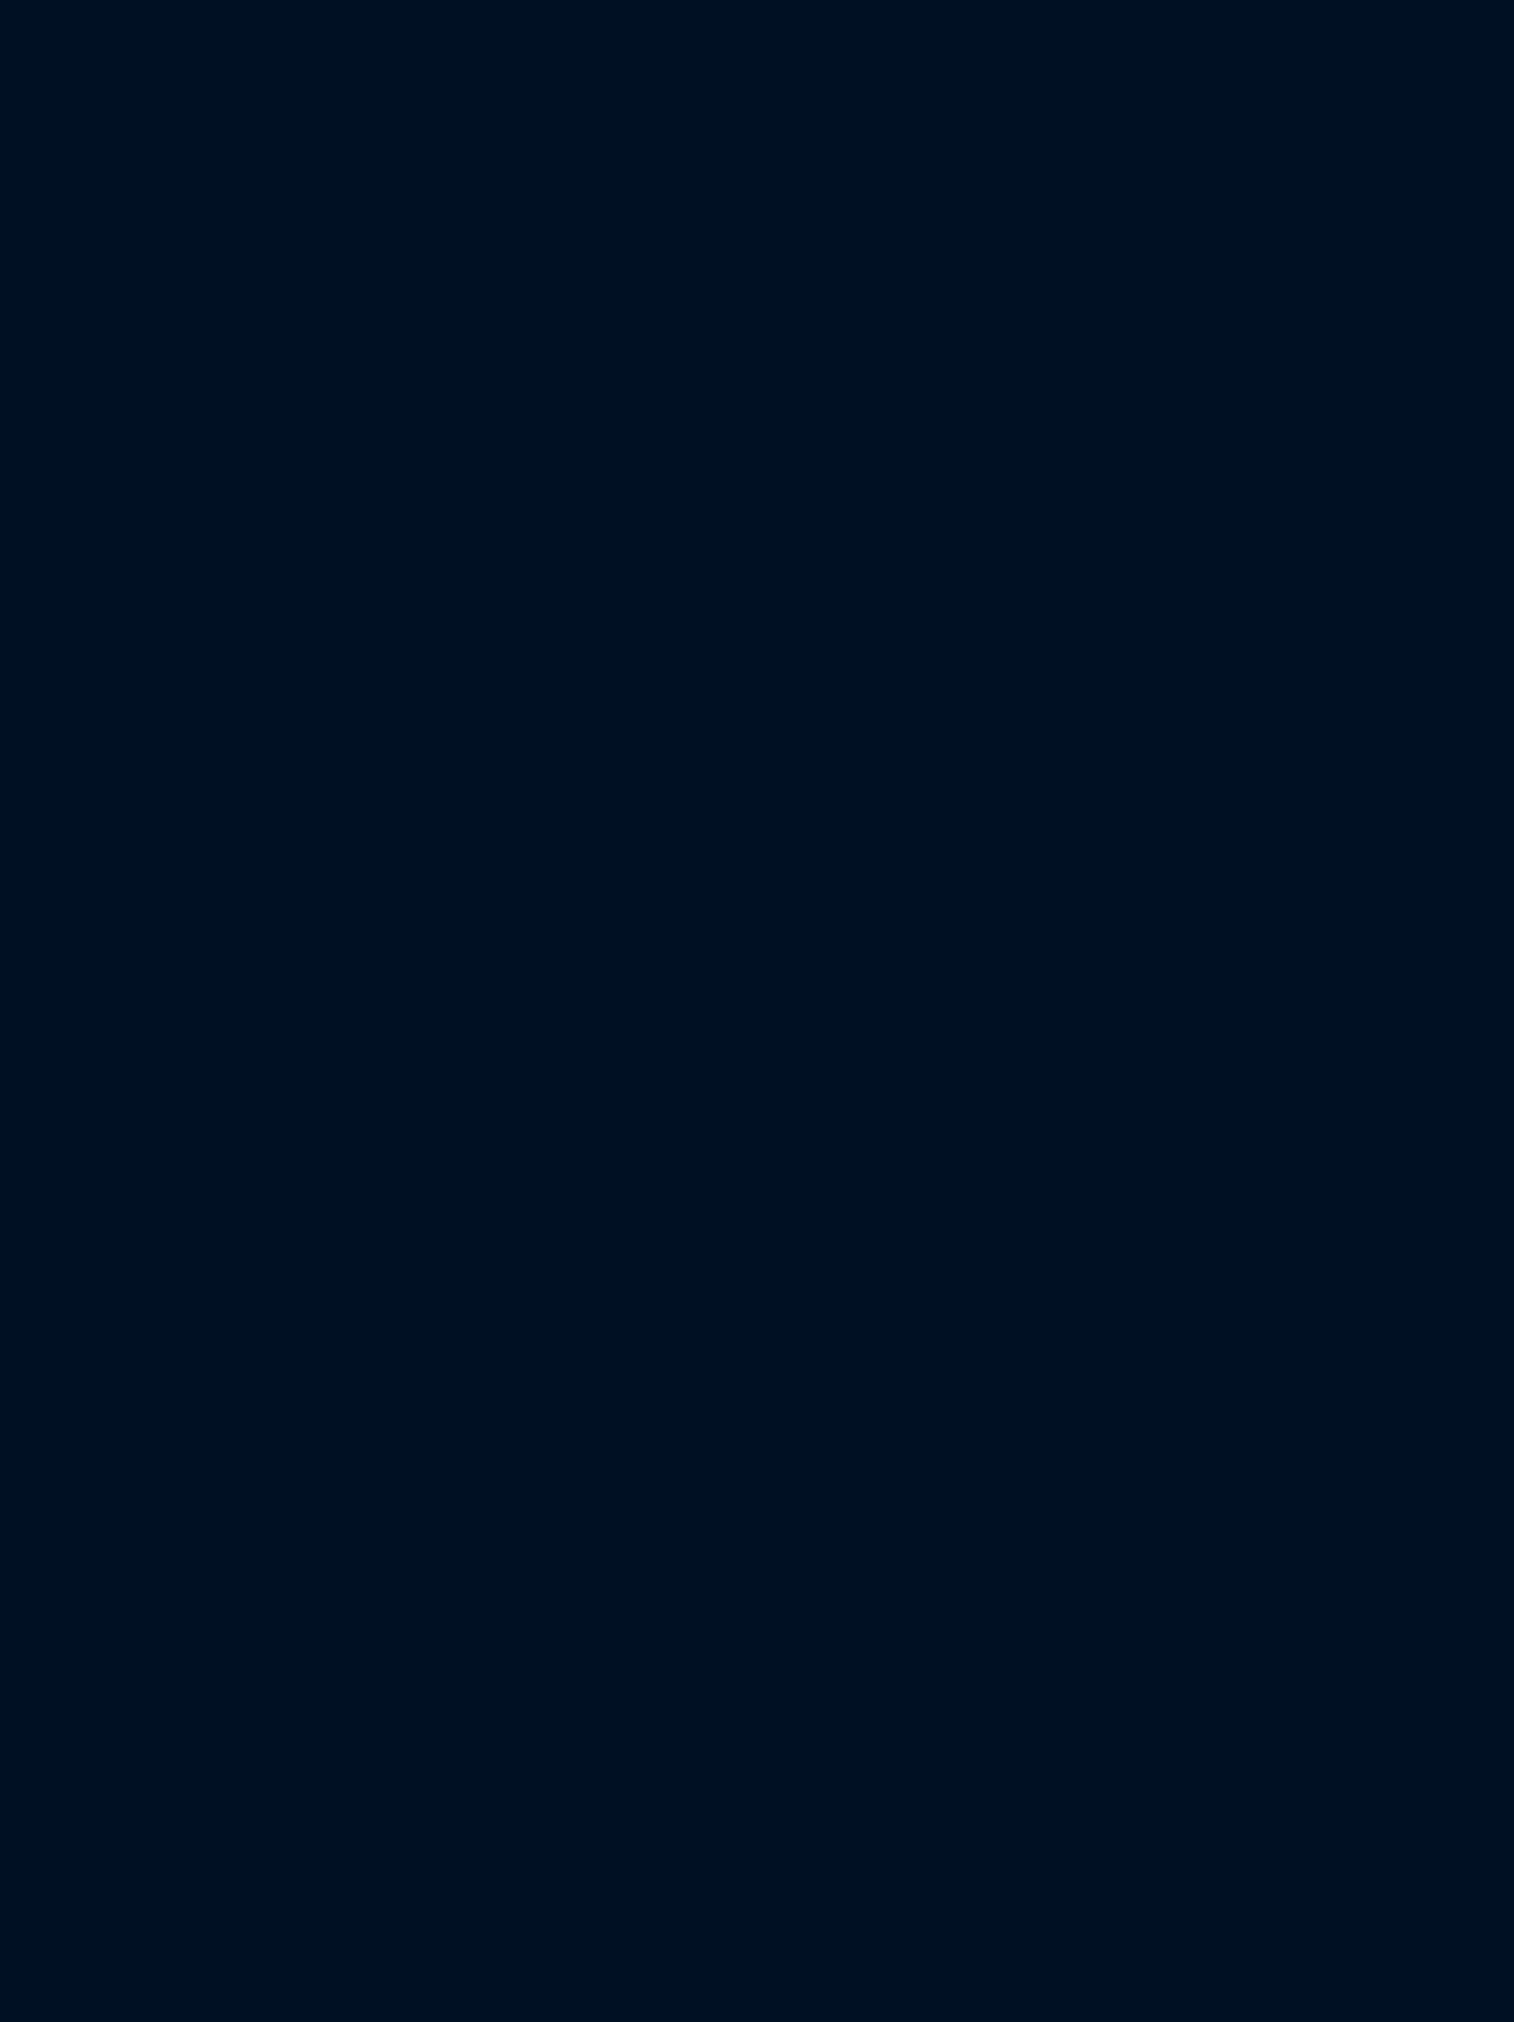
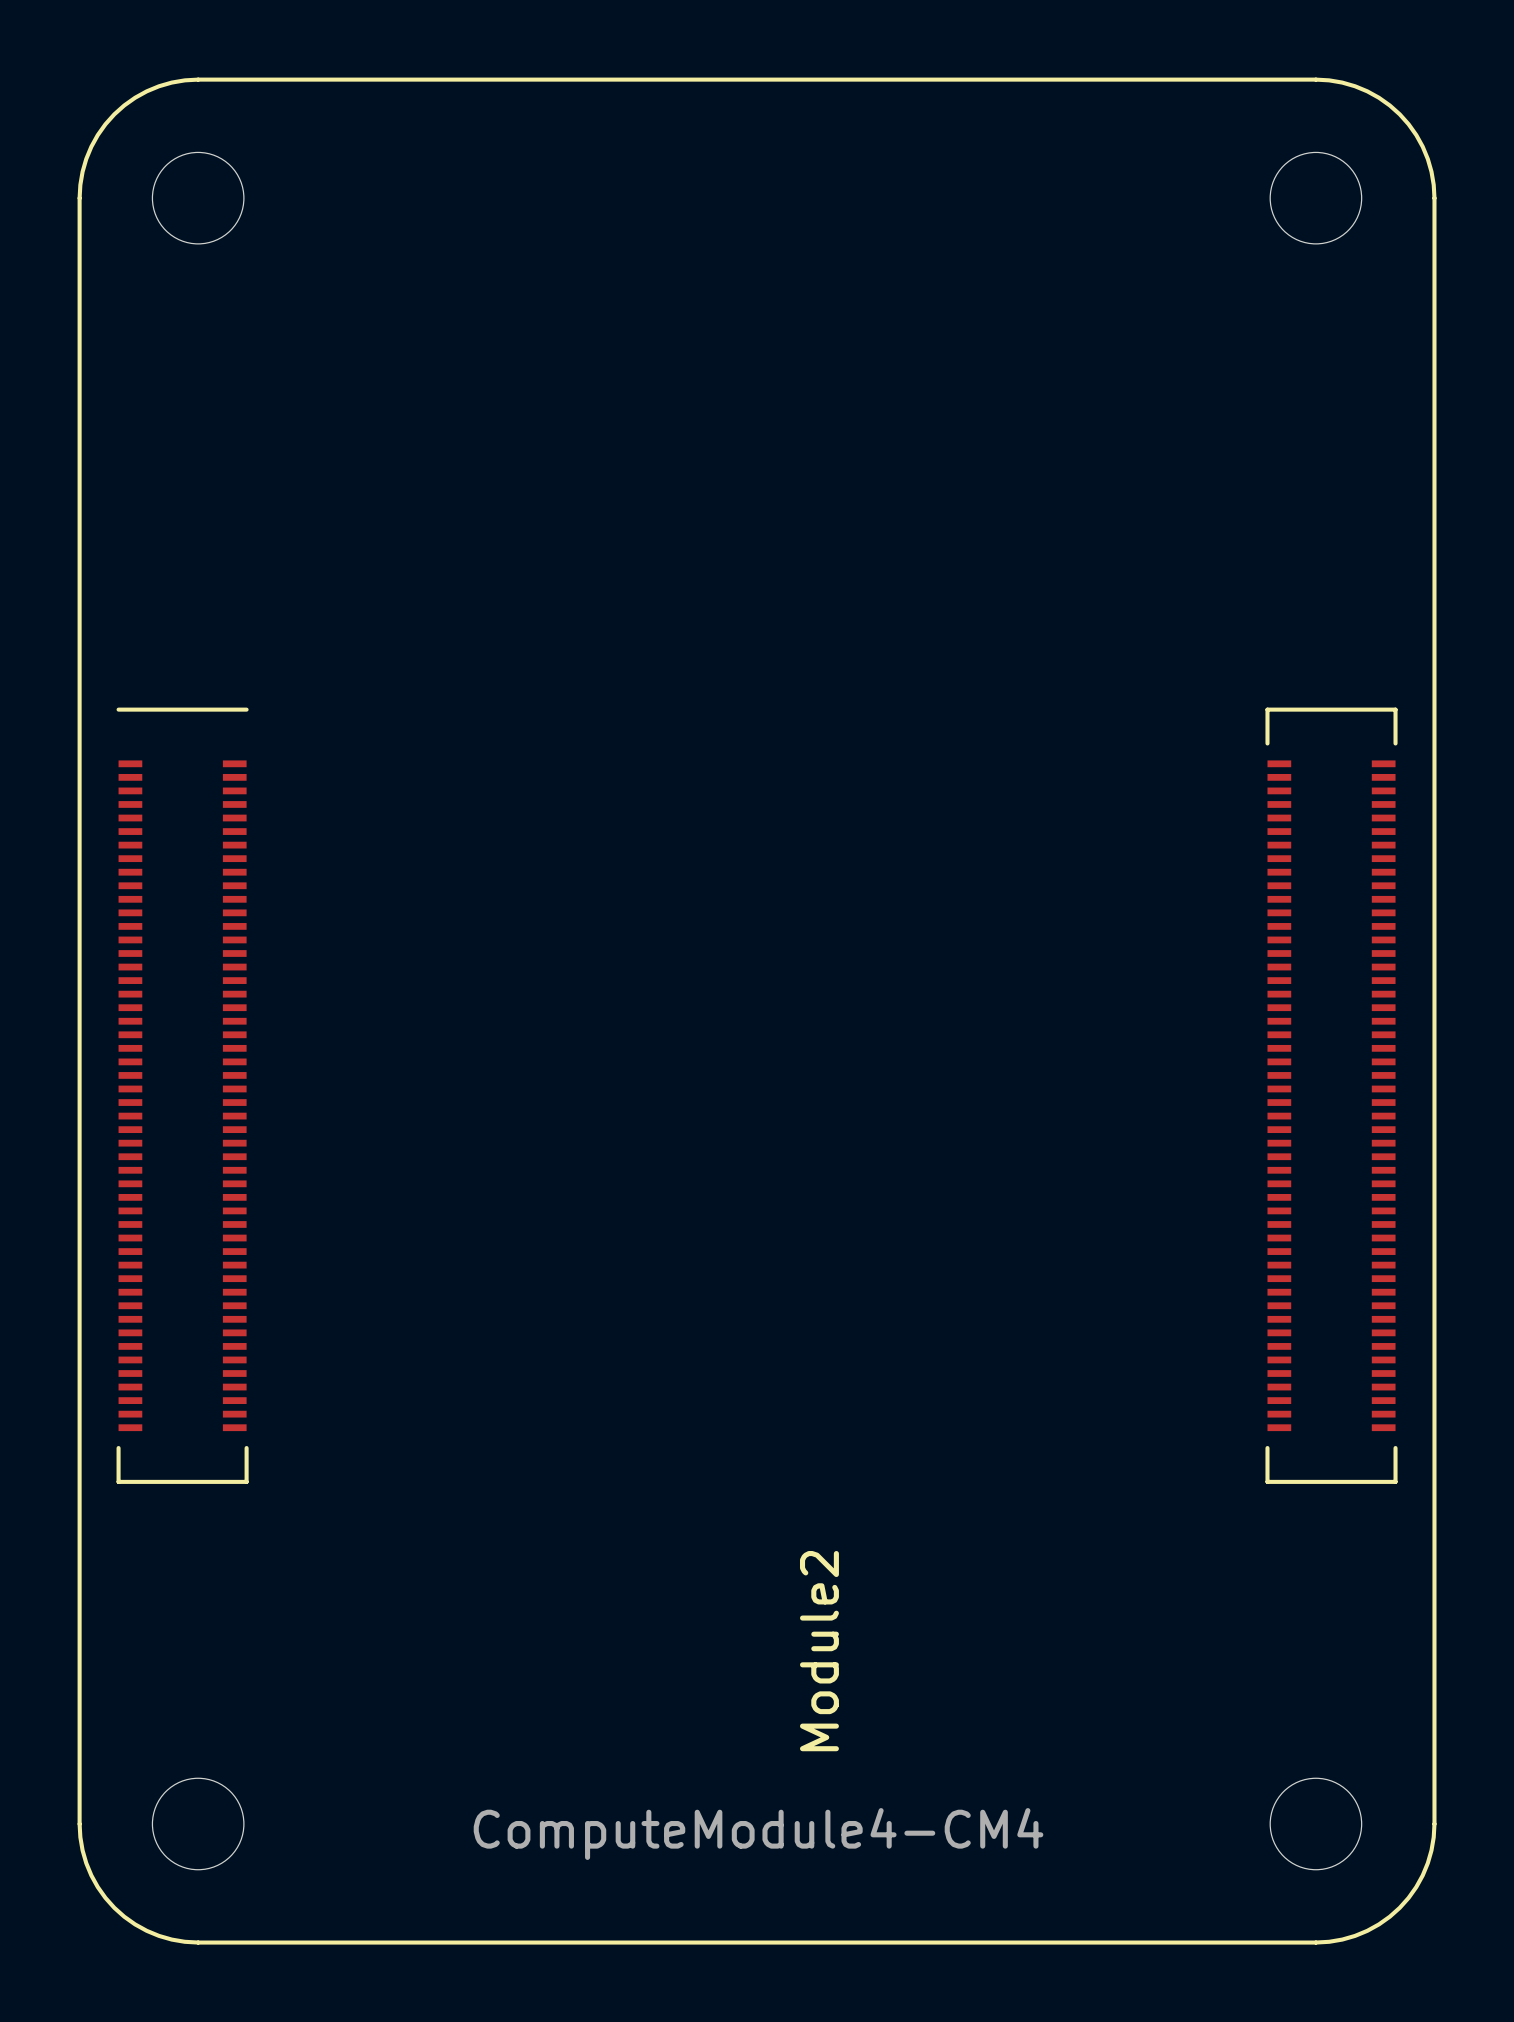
Module2: none -> ComputeModule4-CM4 (757, 1011)

